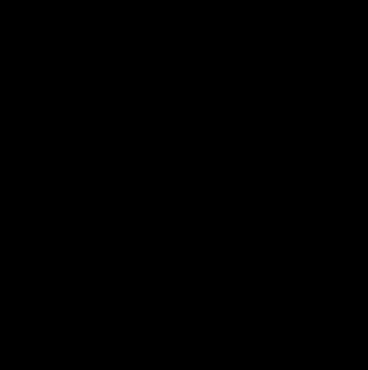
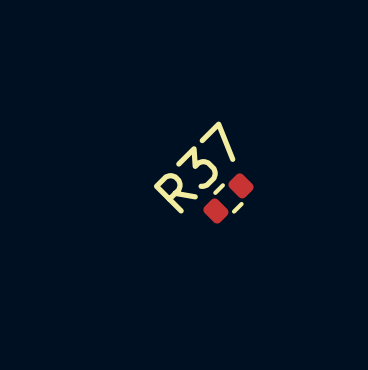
R37: none -> (228, 198)

